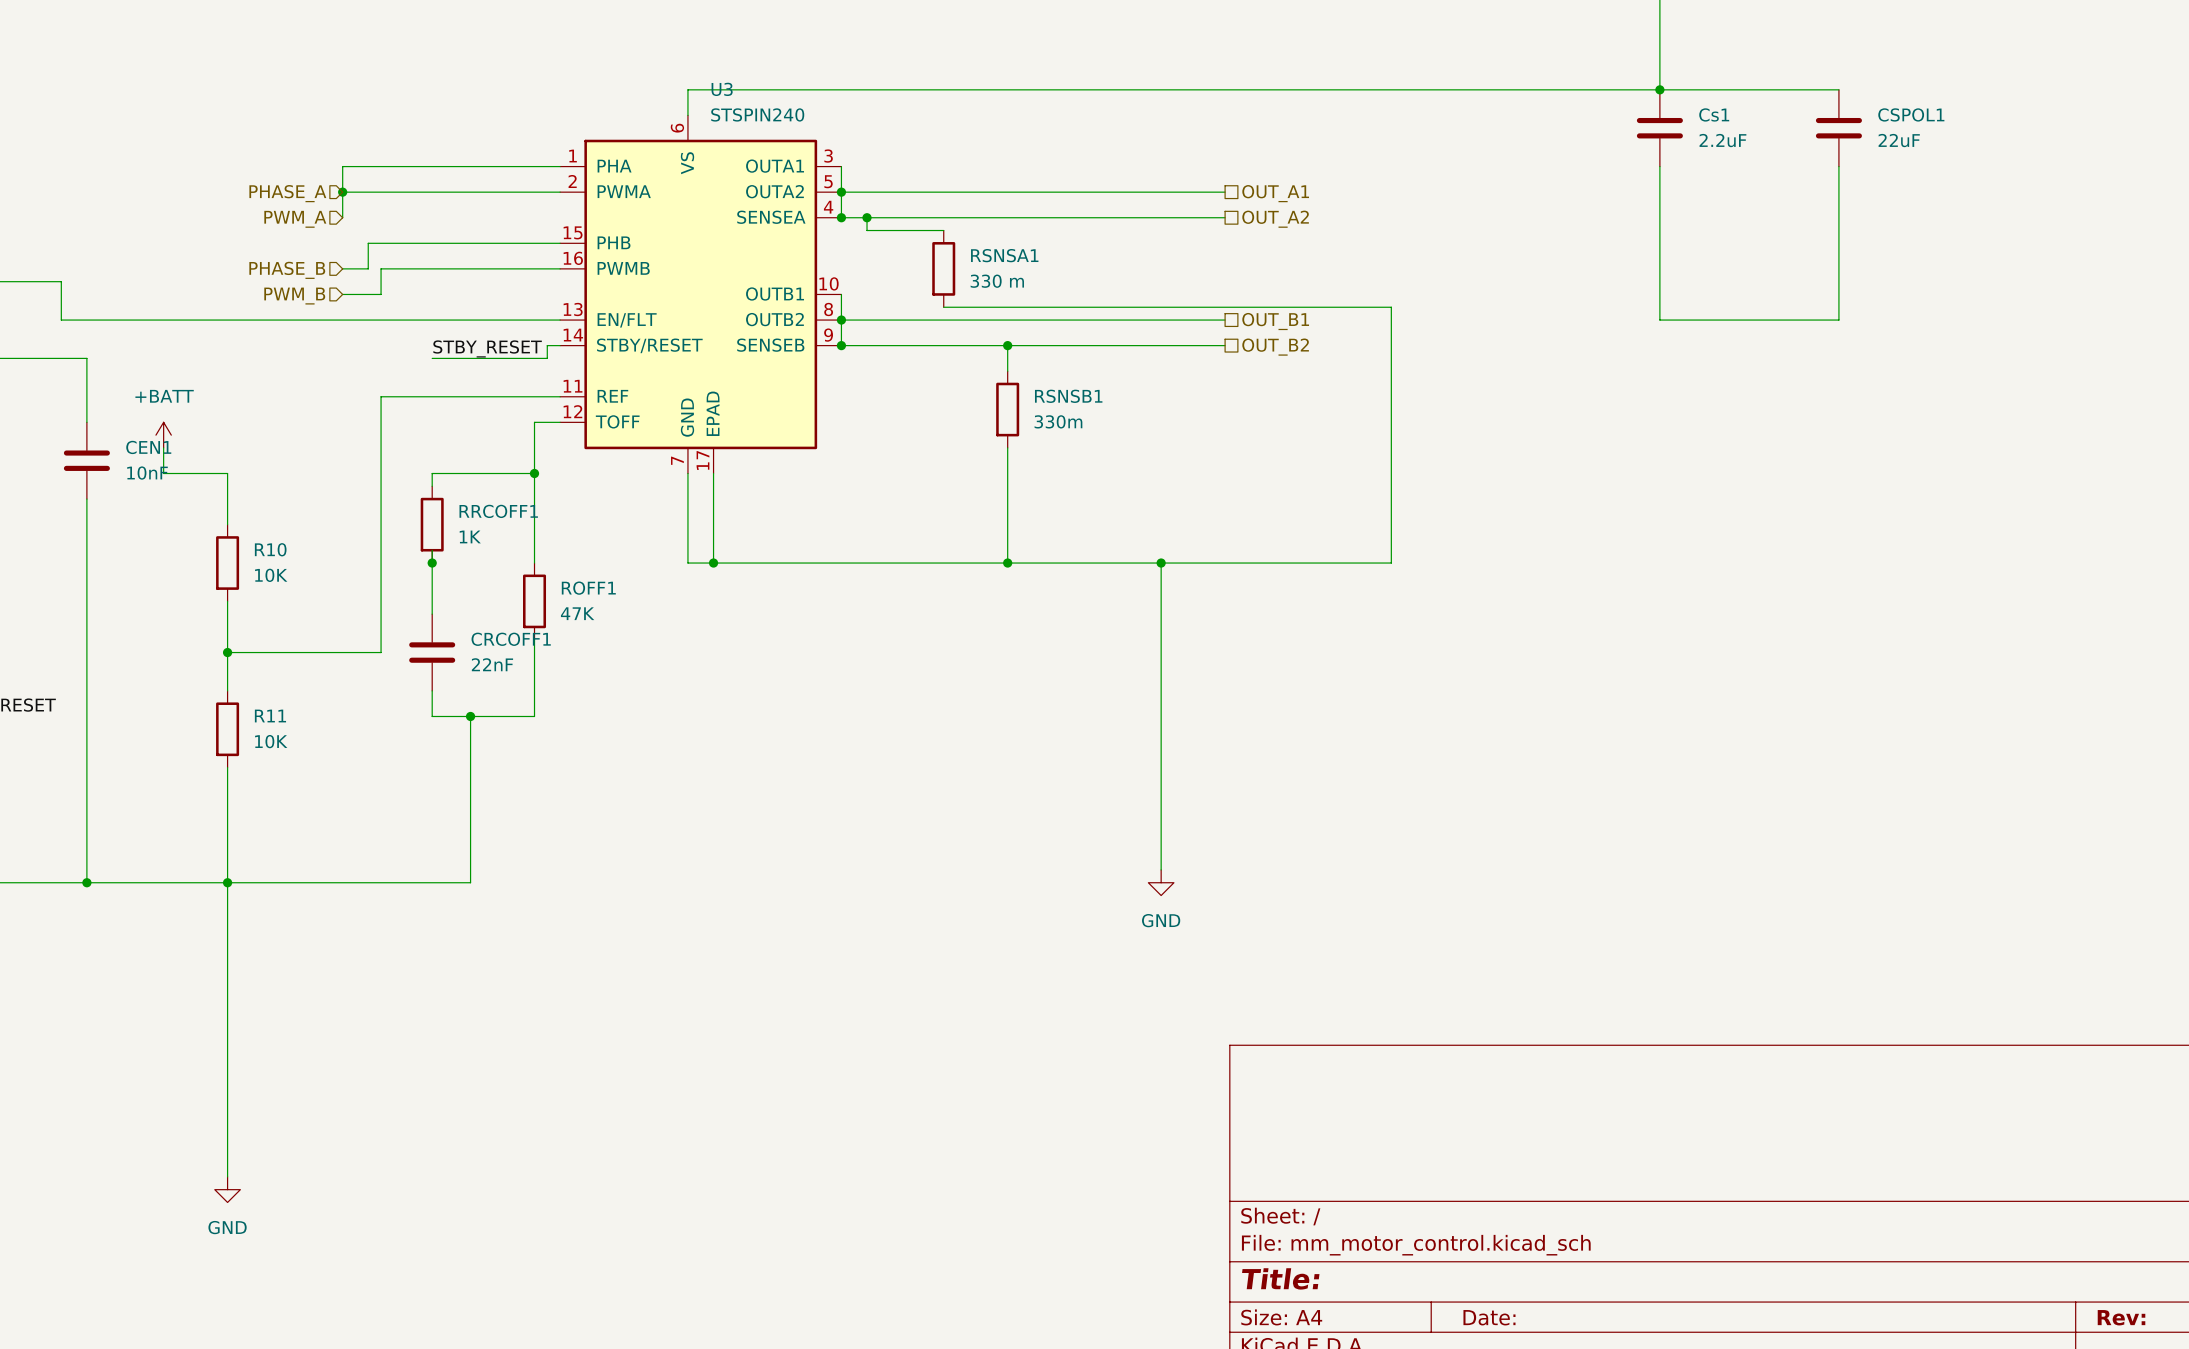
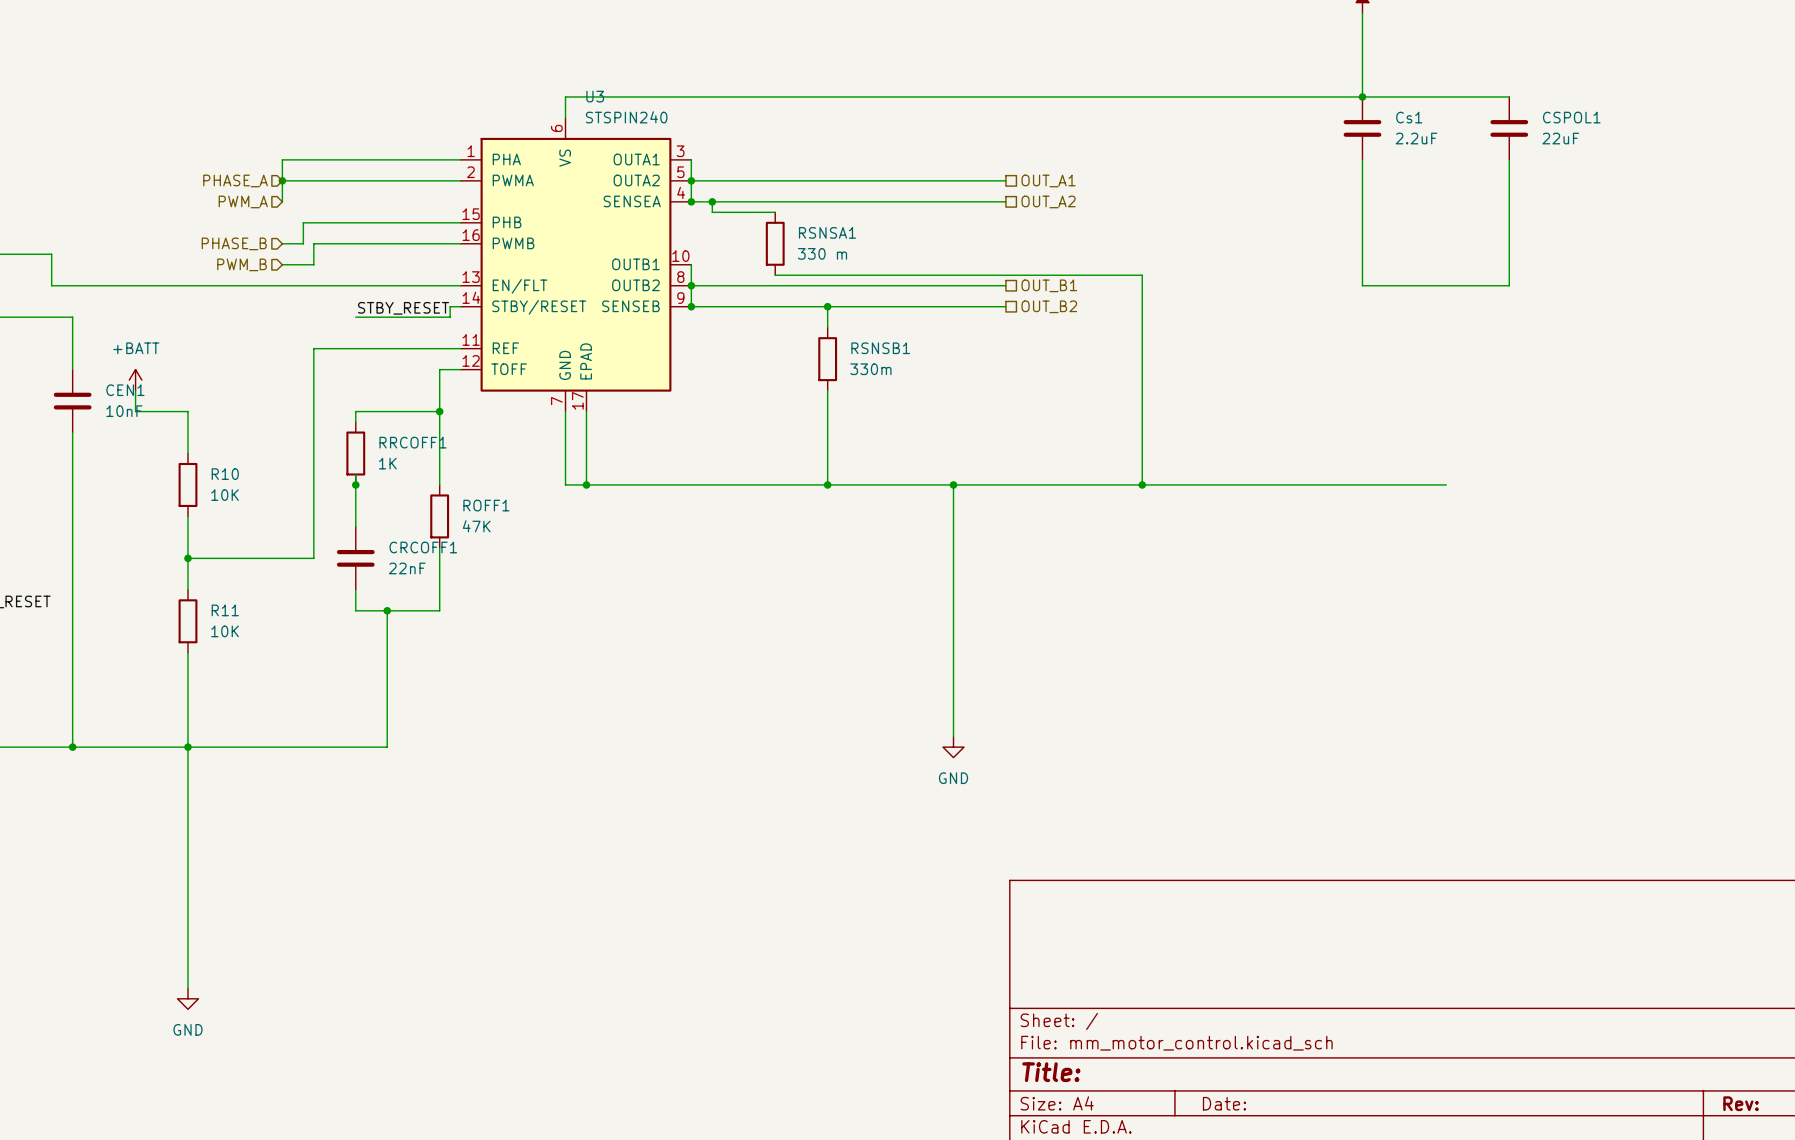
wire: none -> (1142, 484) (1446, 484)
junction: none -> (1142, 484)

